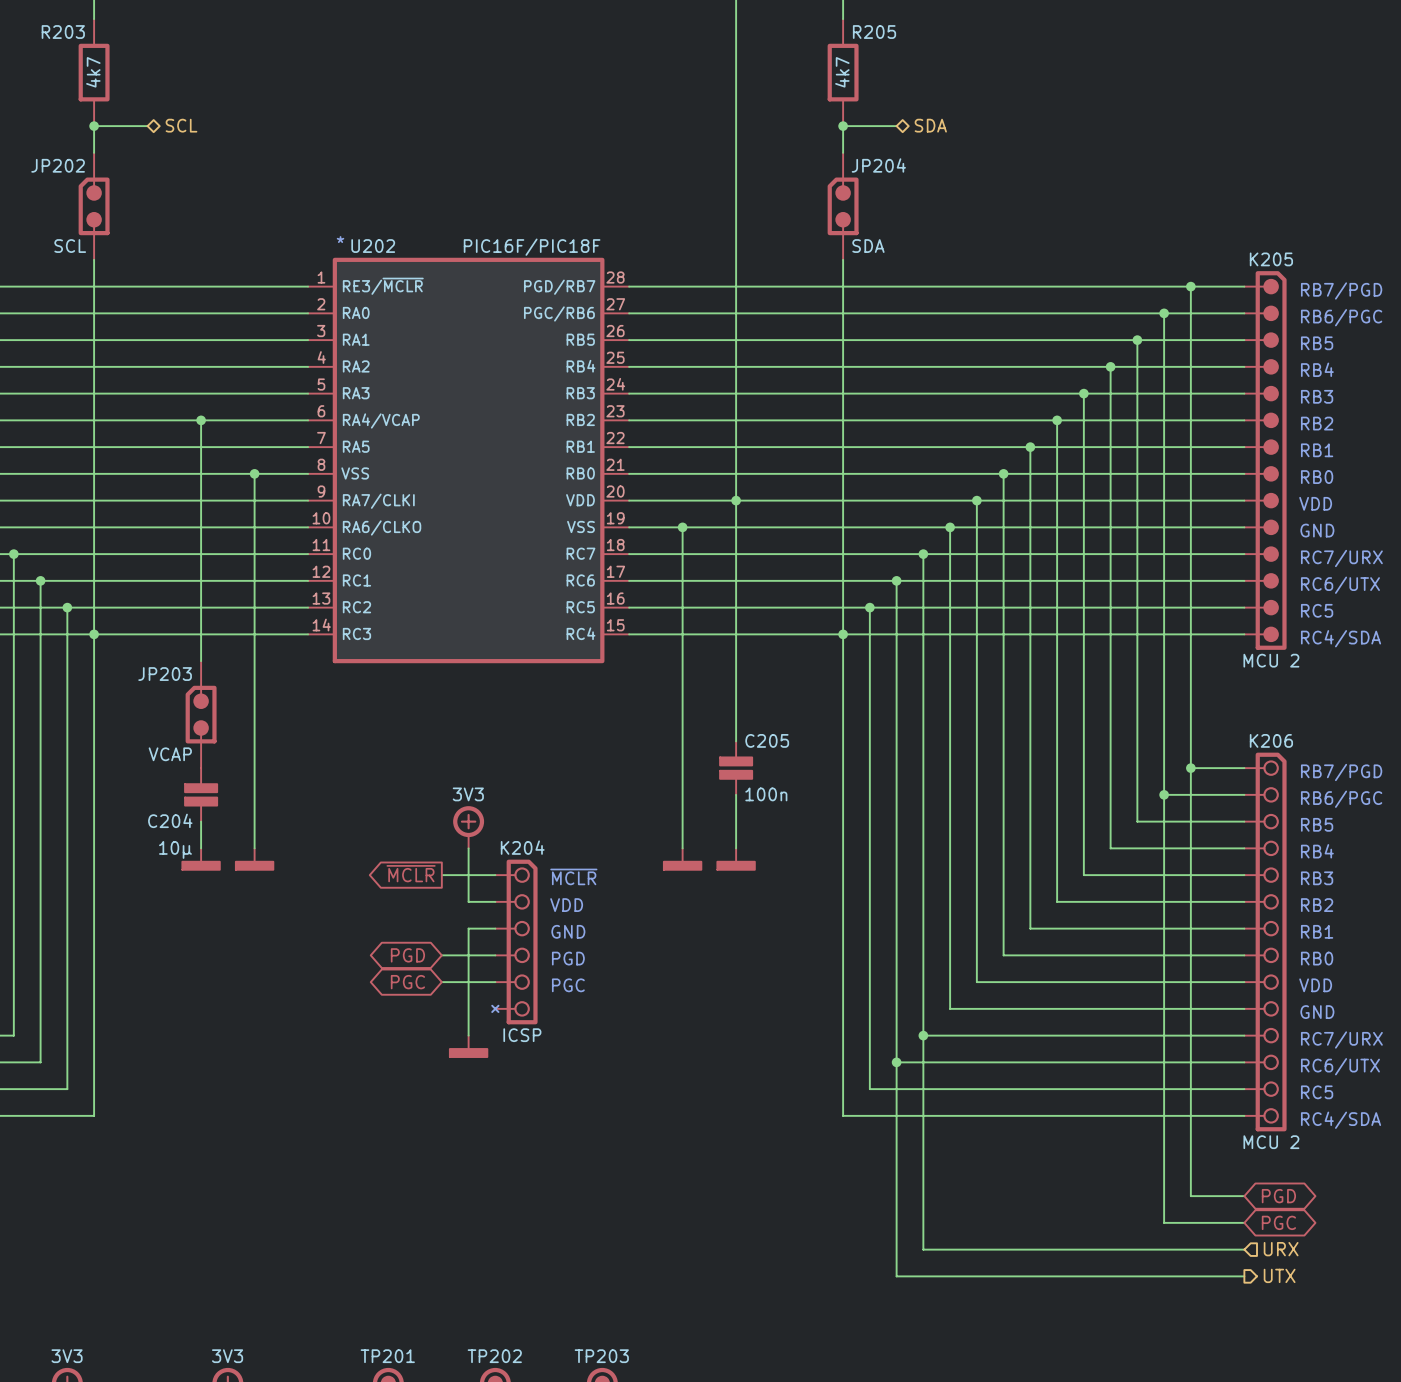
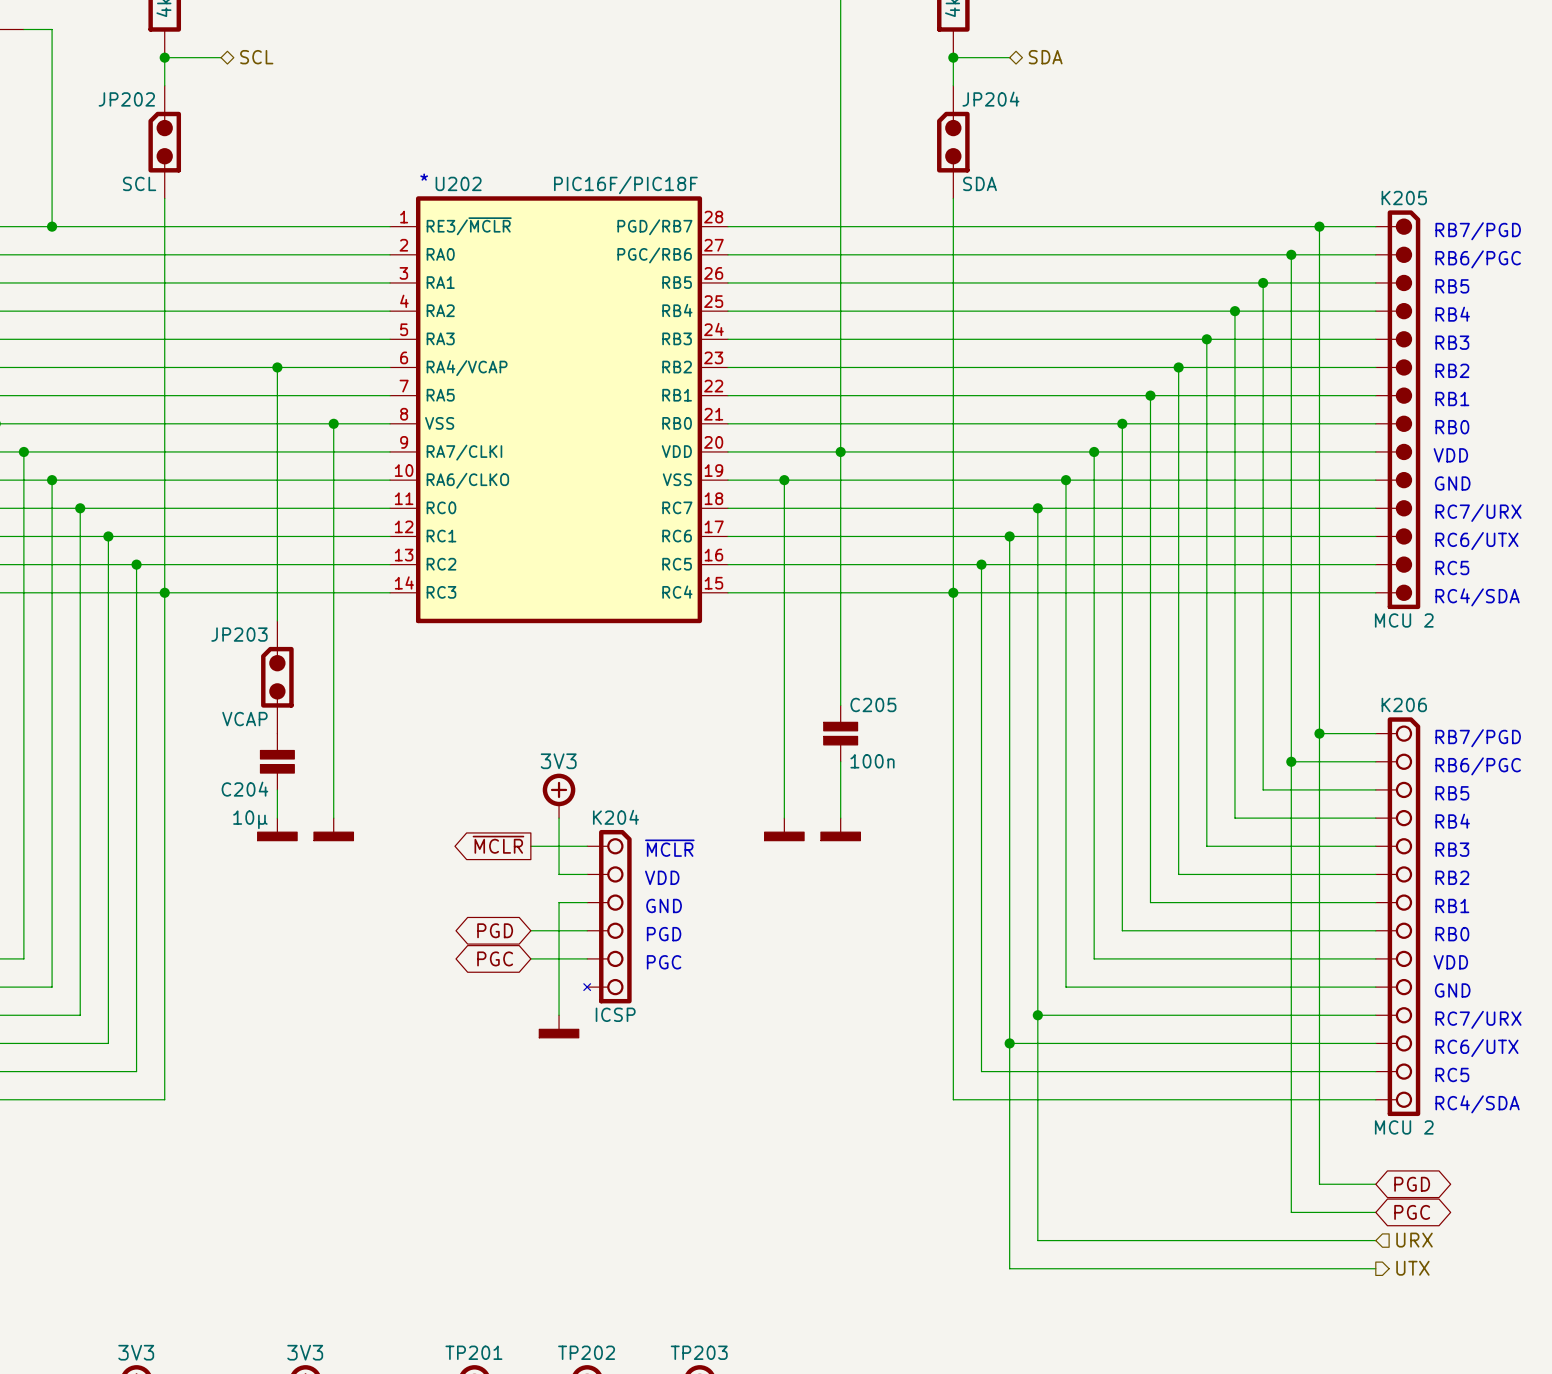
power symbol text: none -> 3V3 (558, 761)
power symbol text: 3V3 (468, 794) -> none
power symbol text: none -> 3V3 (136, 1352)
power symbol text: 3V3 (67, 1356) -> none
power symbol text: none -> 3V3 (305, 1352)
power symbol text: 3V3 (227, 1356) -> none

